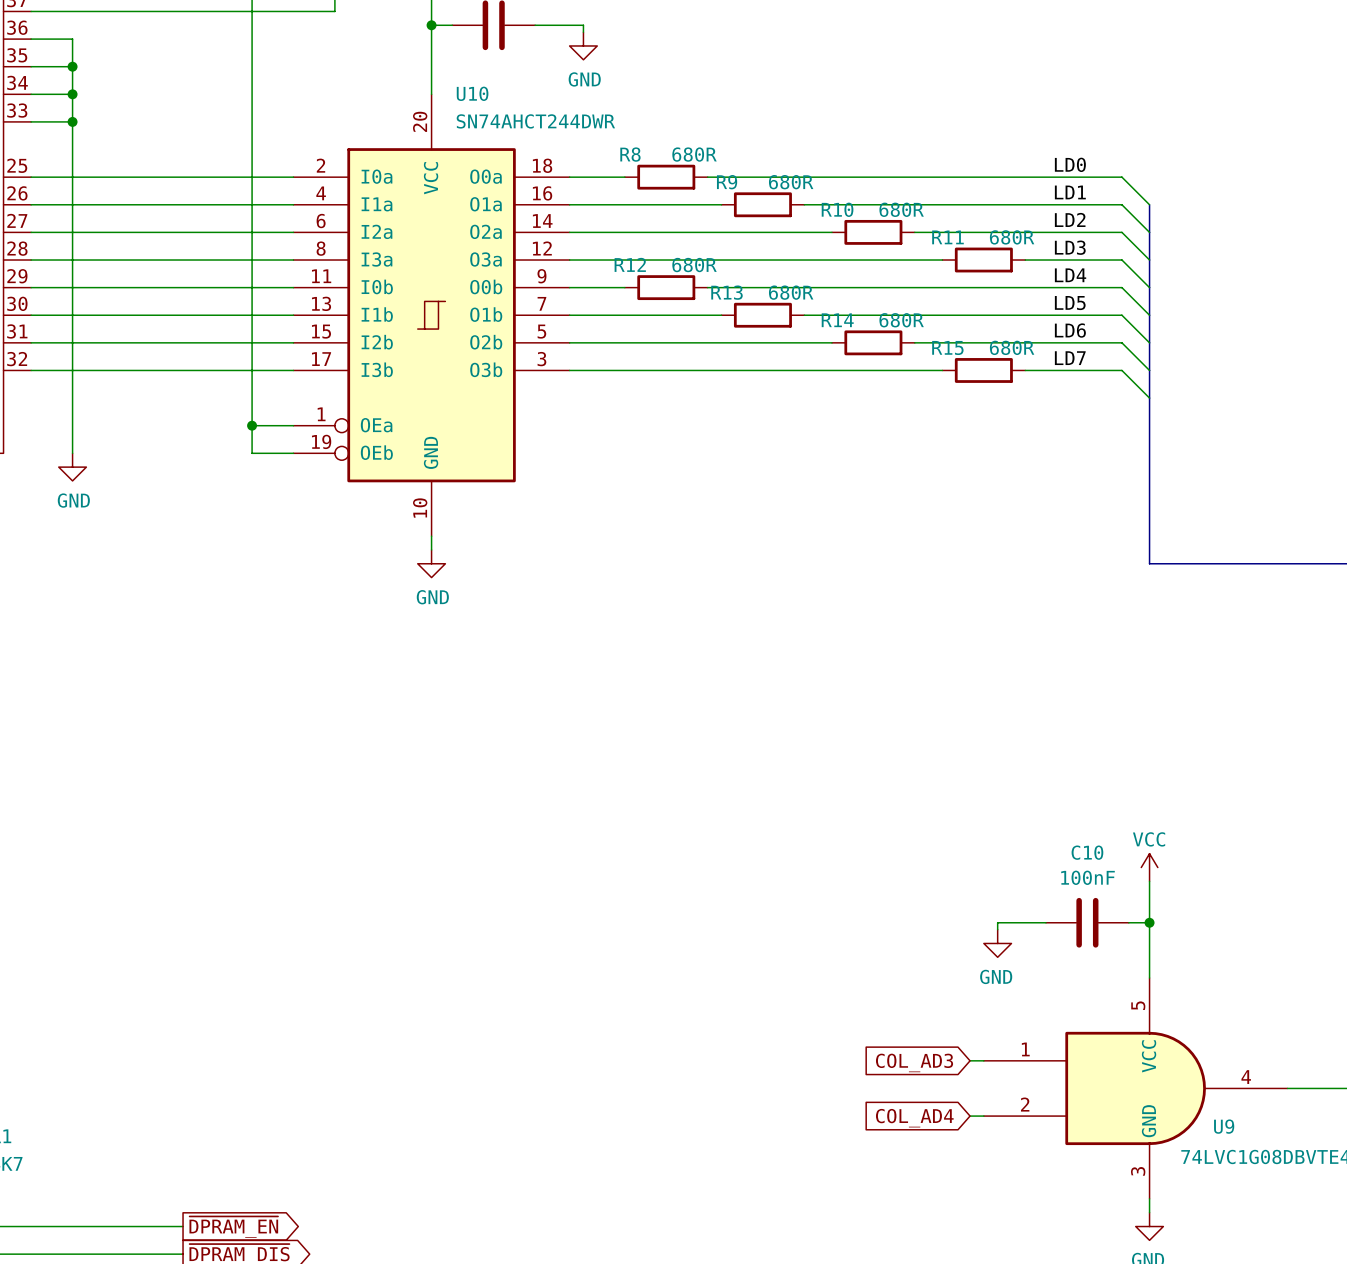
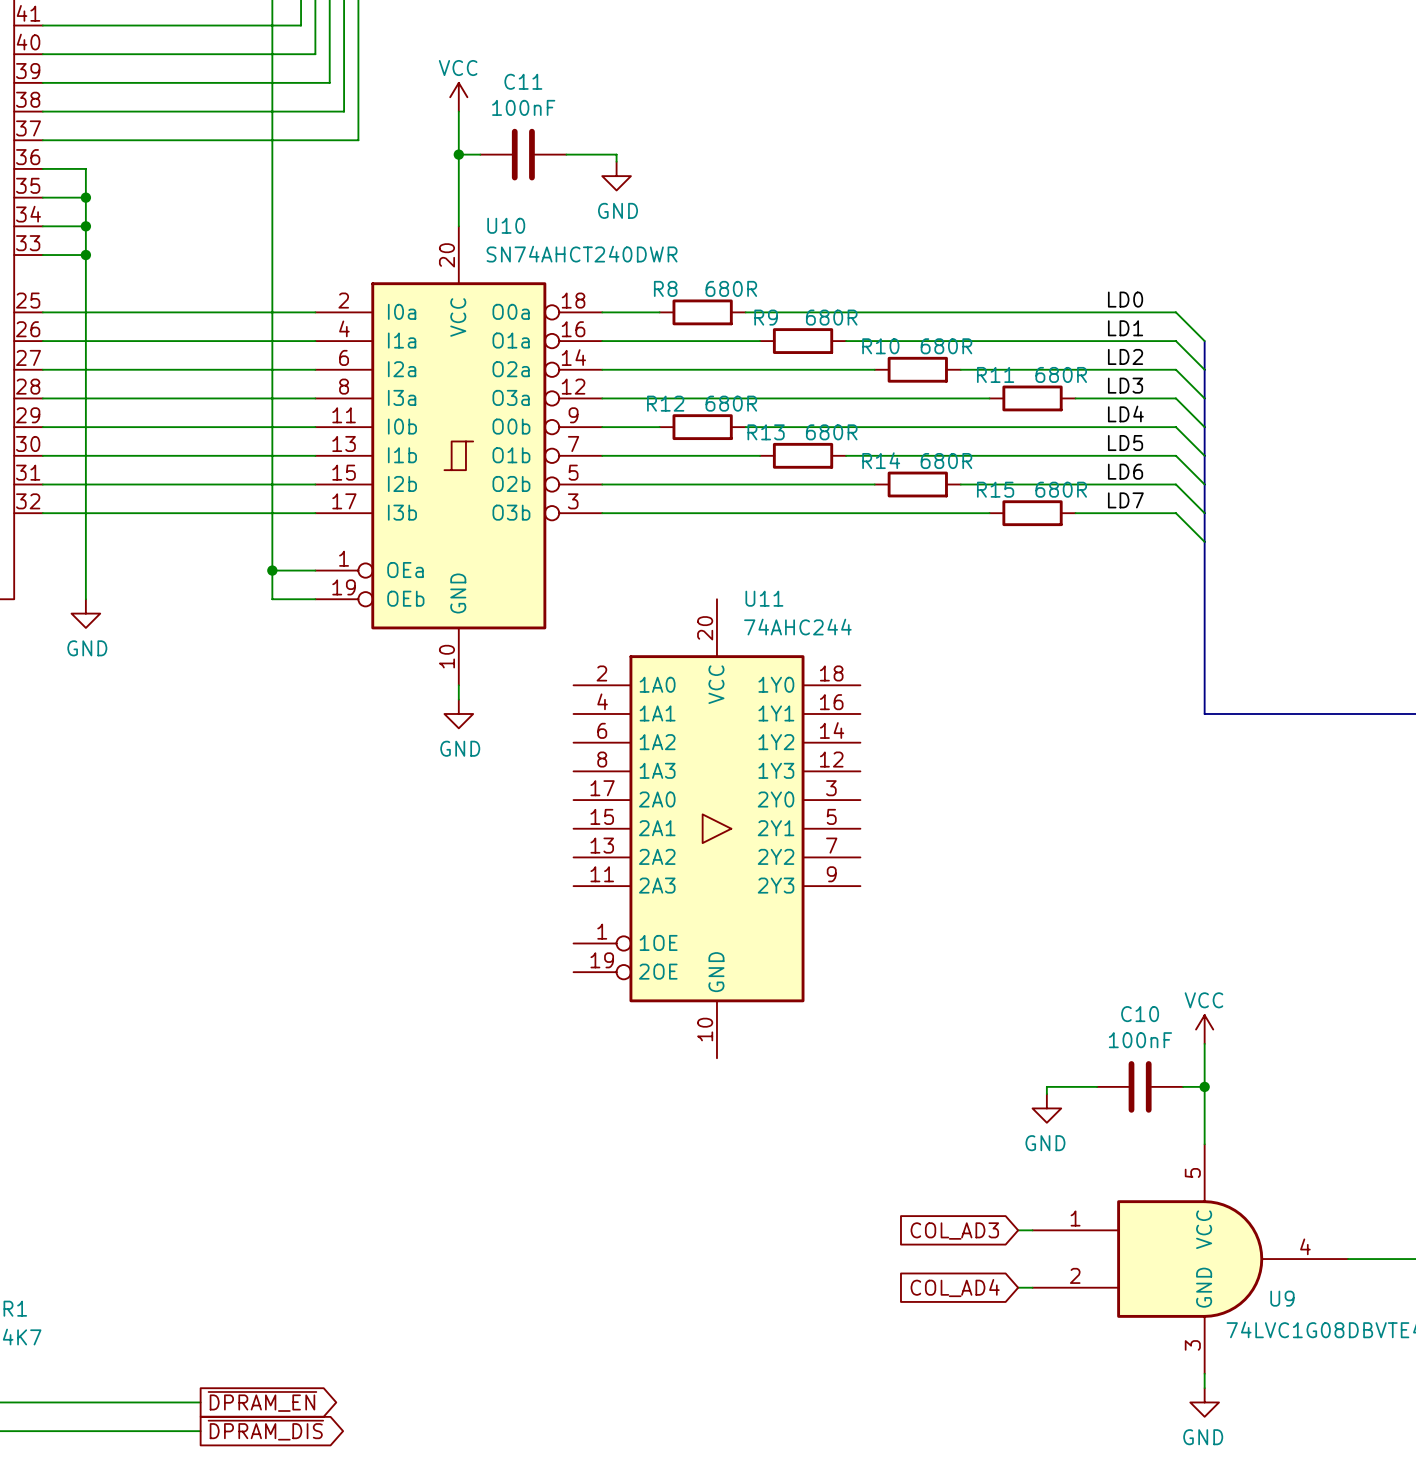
U10 symbol: [293, 94, 570, 537] -> [315, 226, 603, 686]
U10 value: SN74AHCT244DWR (535, 121) -> SN74AHCT240DWR (582, 254)
U11: none -> 74AHC244 (716, 828)

